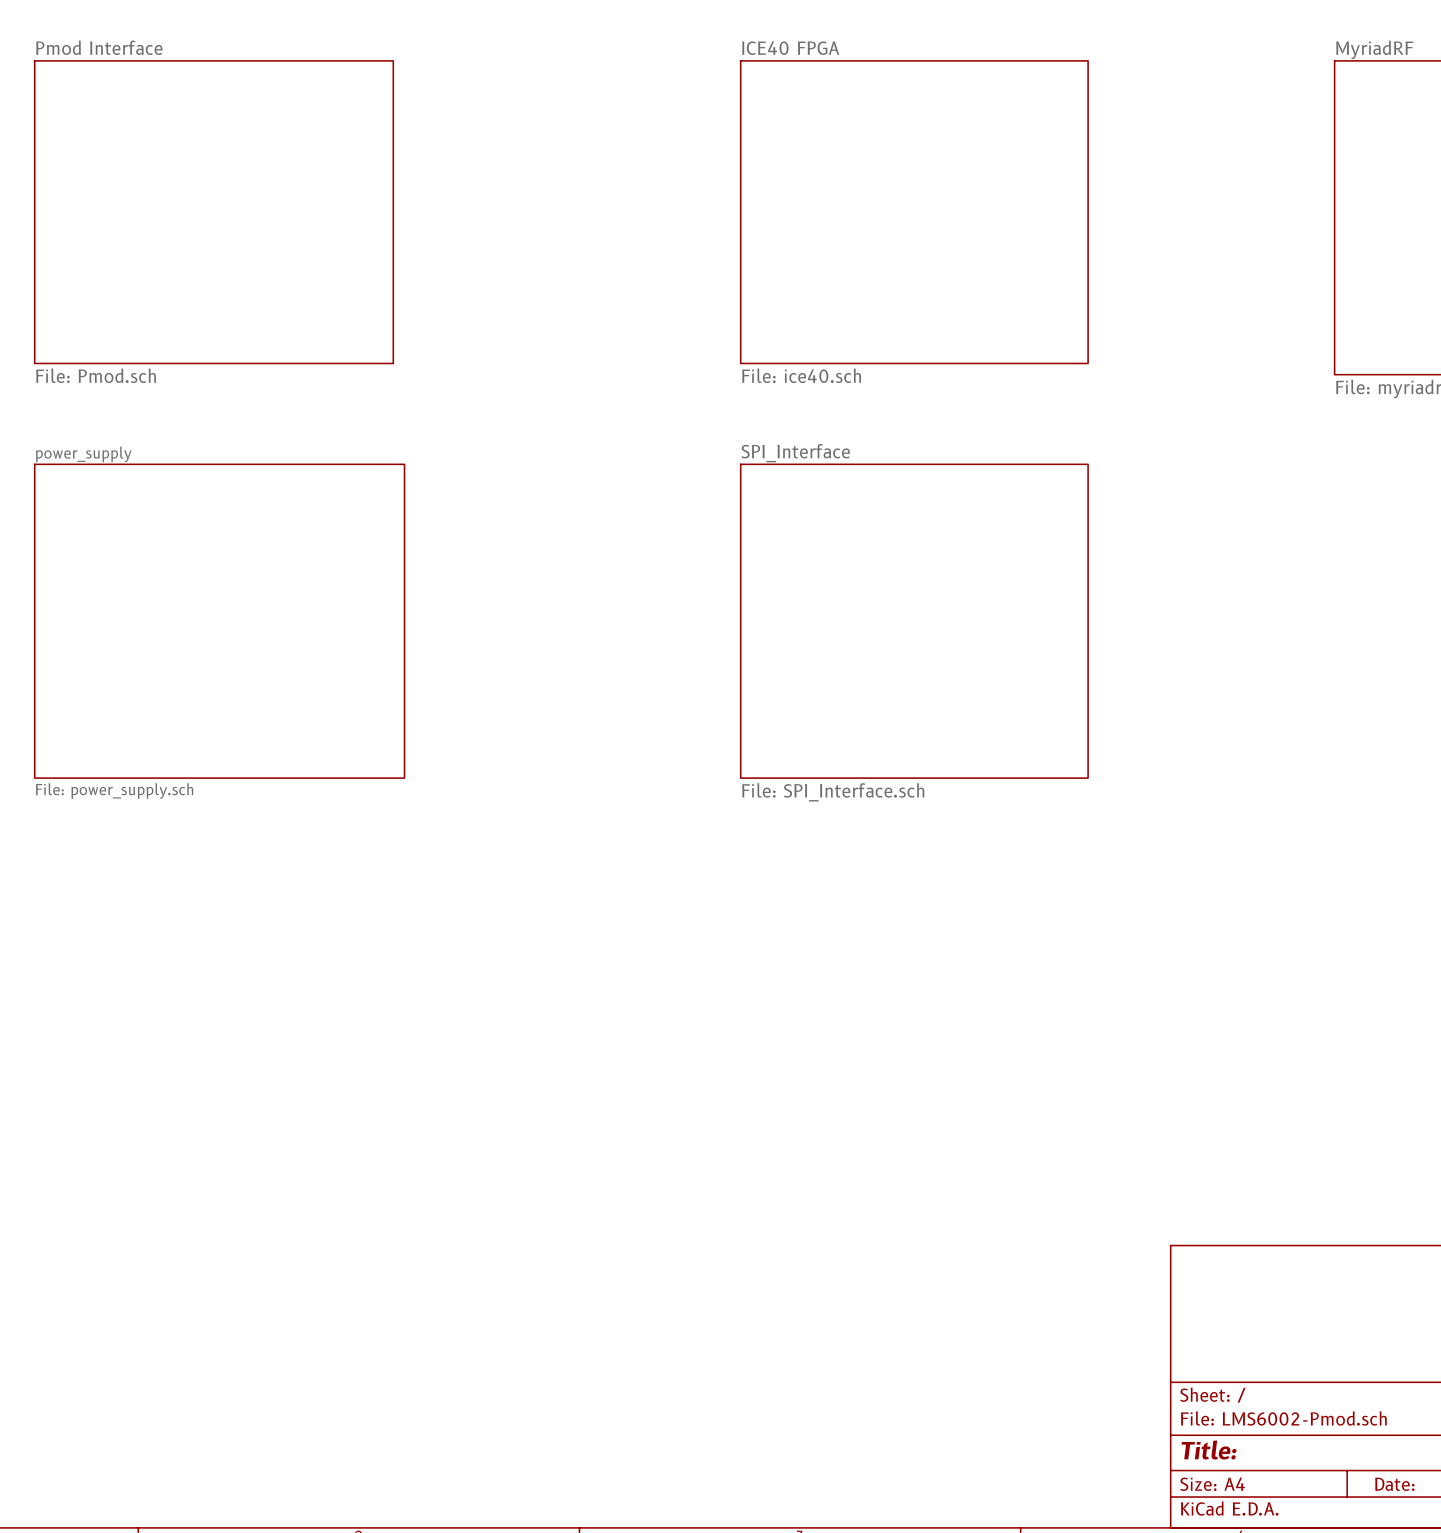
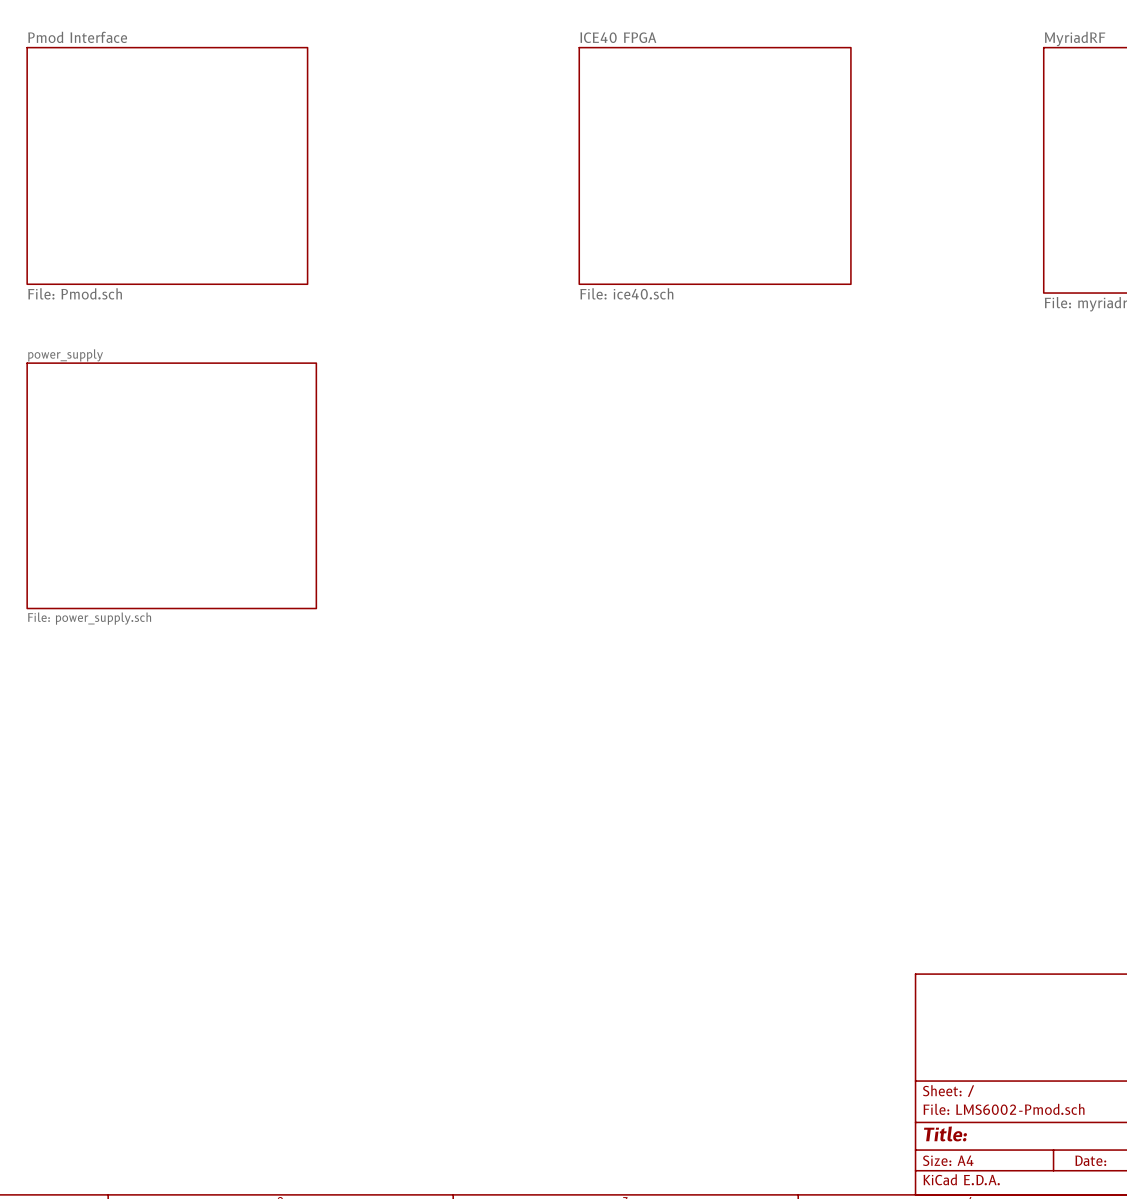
sheet SPI_Interface: File: SPI_Interface.sch (914, 621) -> none

